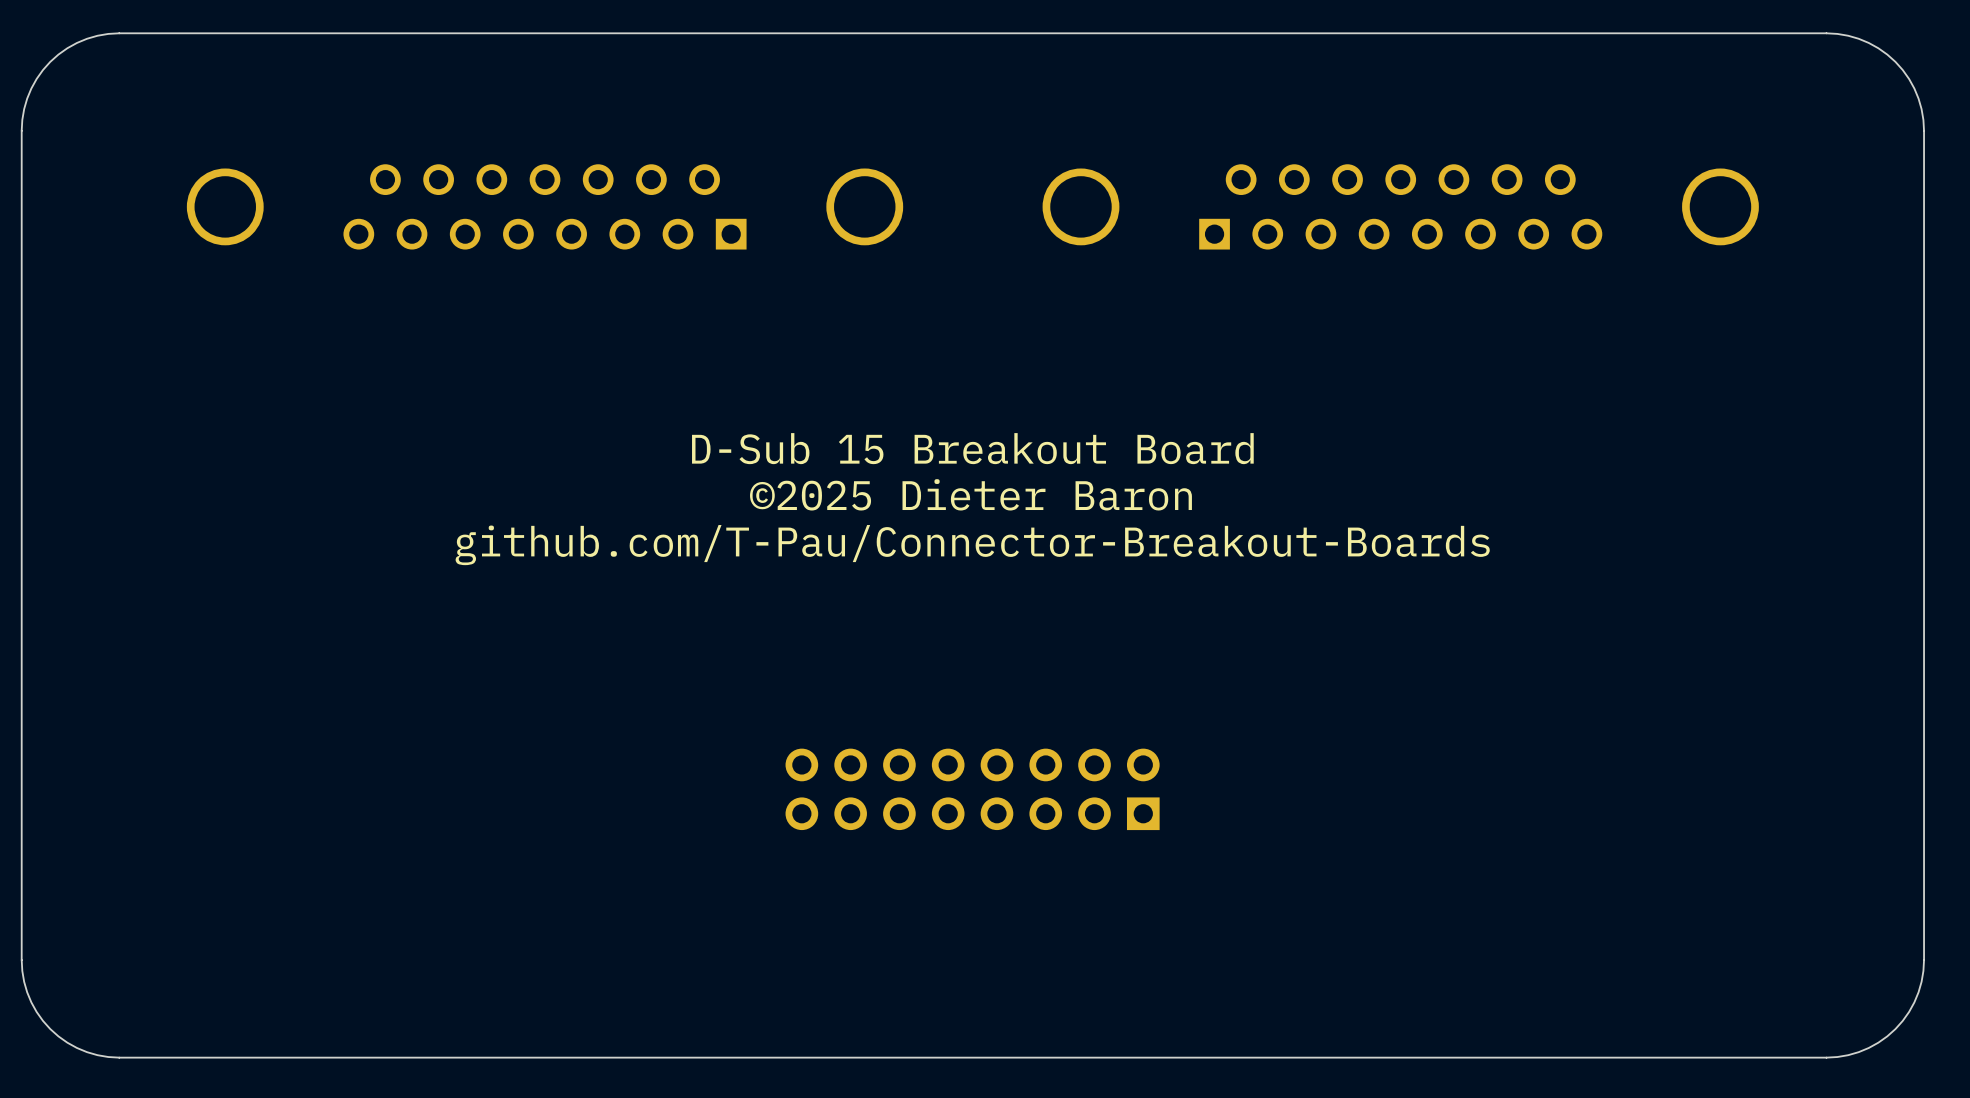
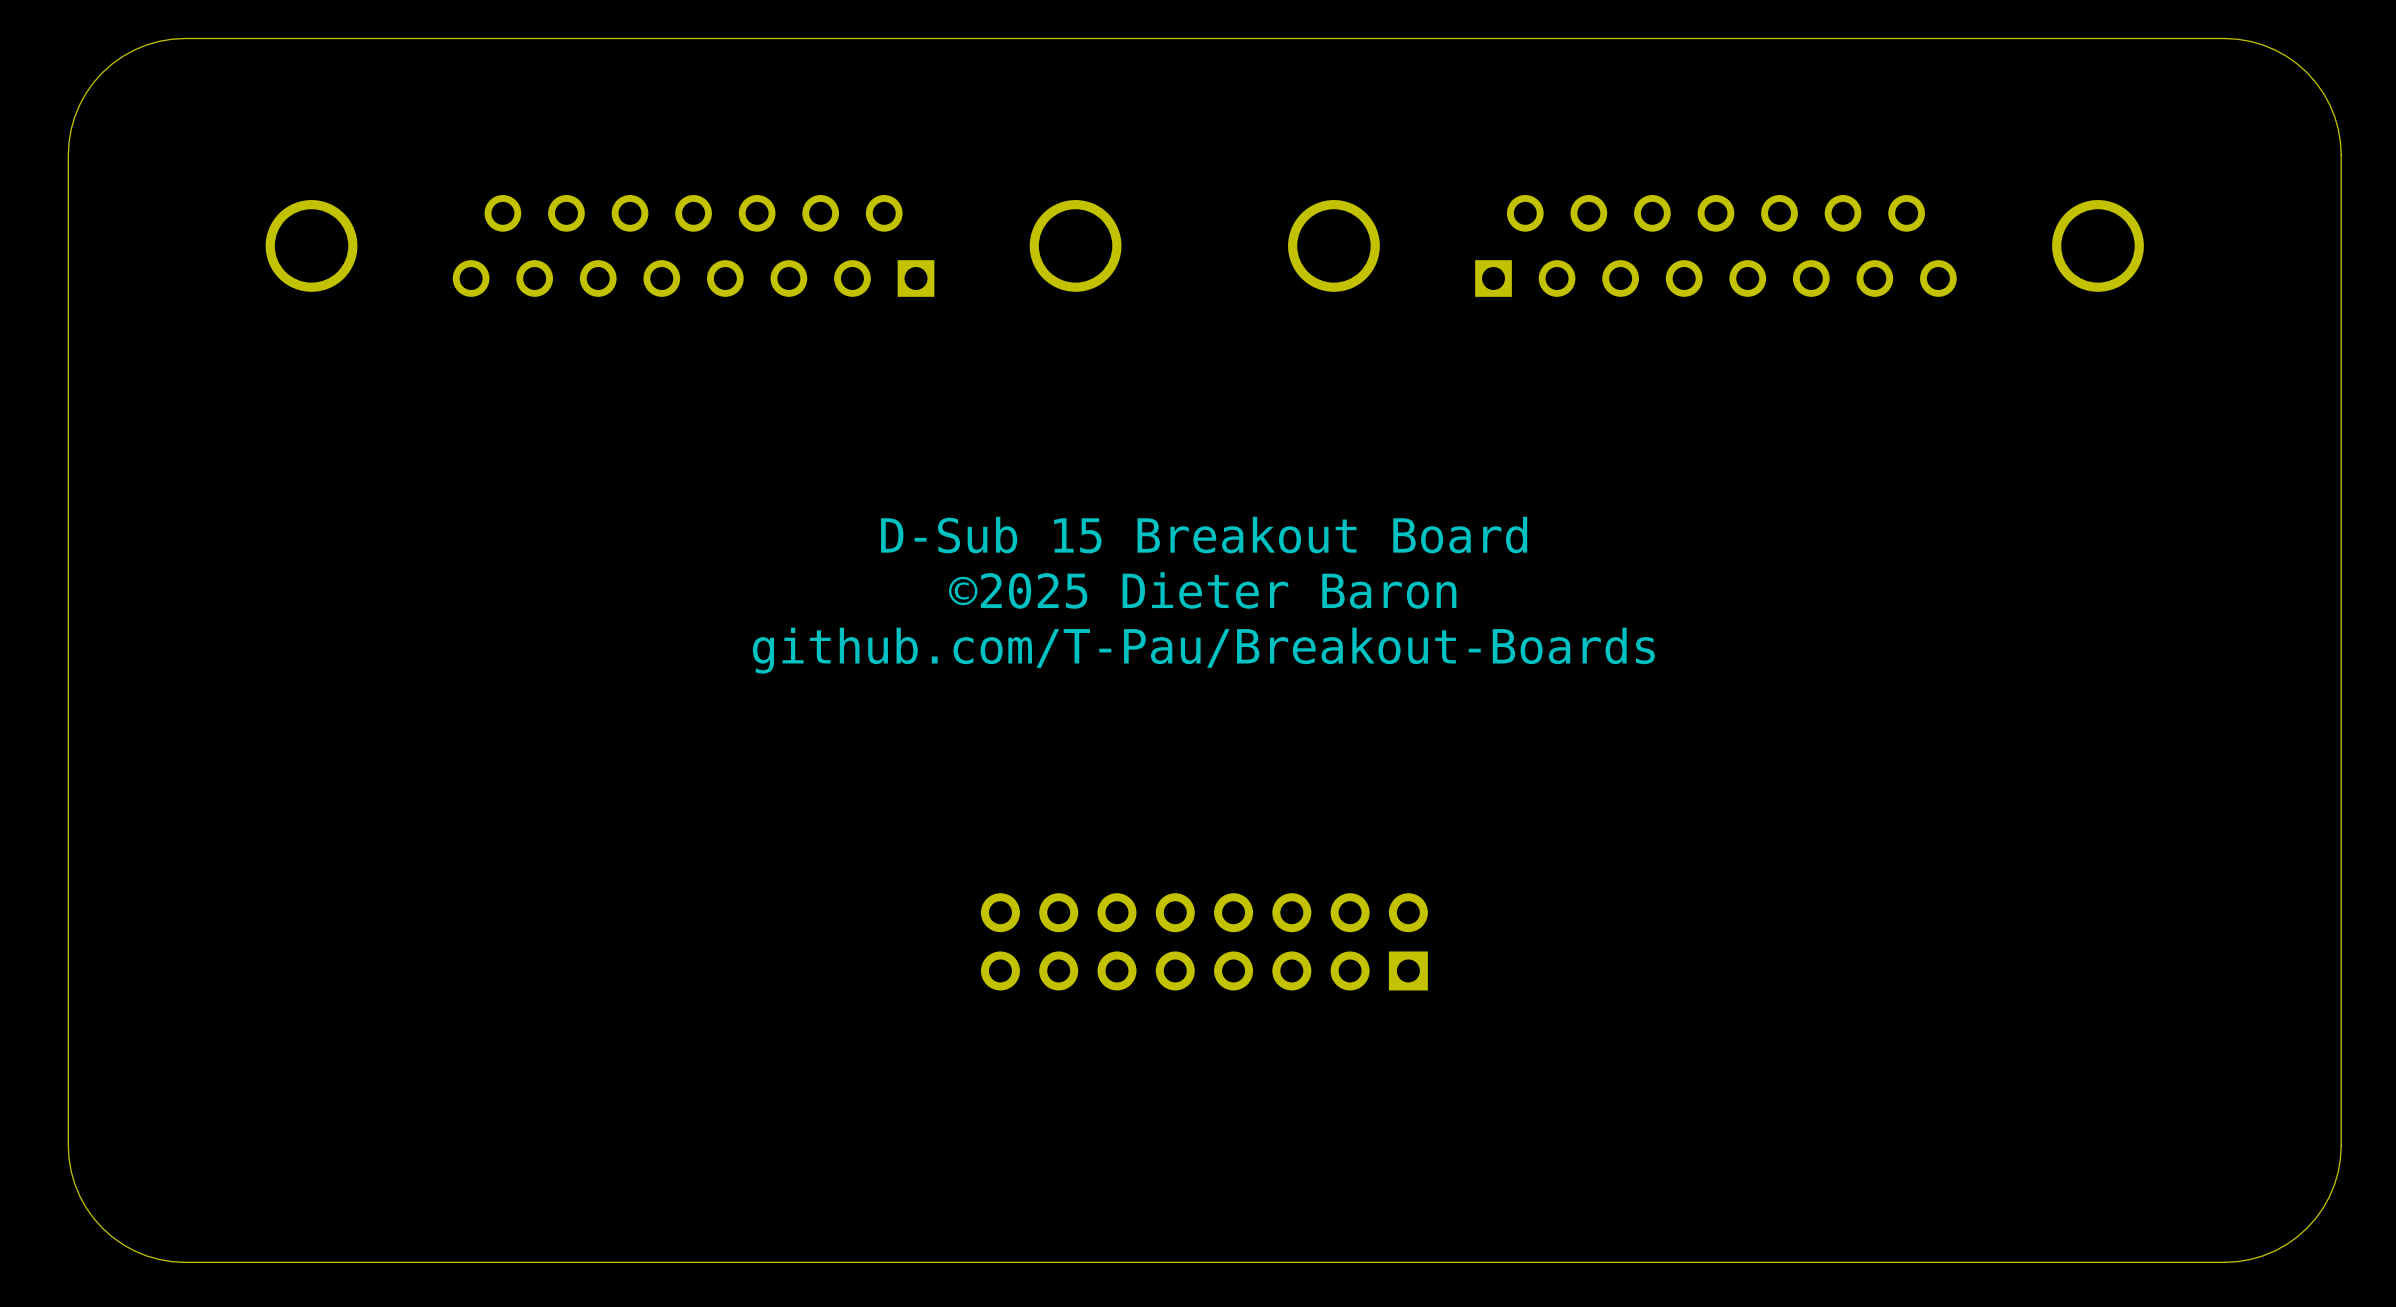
text: github.com/T-Pau/Connector-Breakout-Boards (972, 545) -> github.com/T-Pau/Breakout-Boards (1203, 650)

